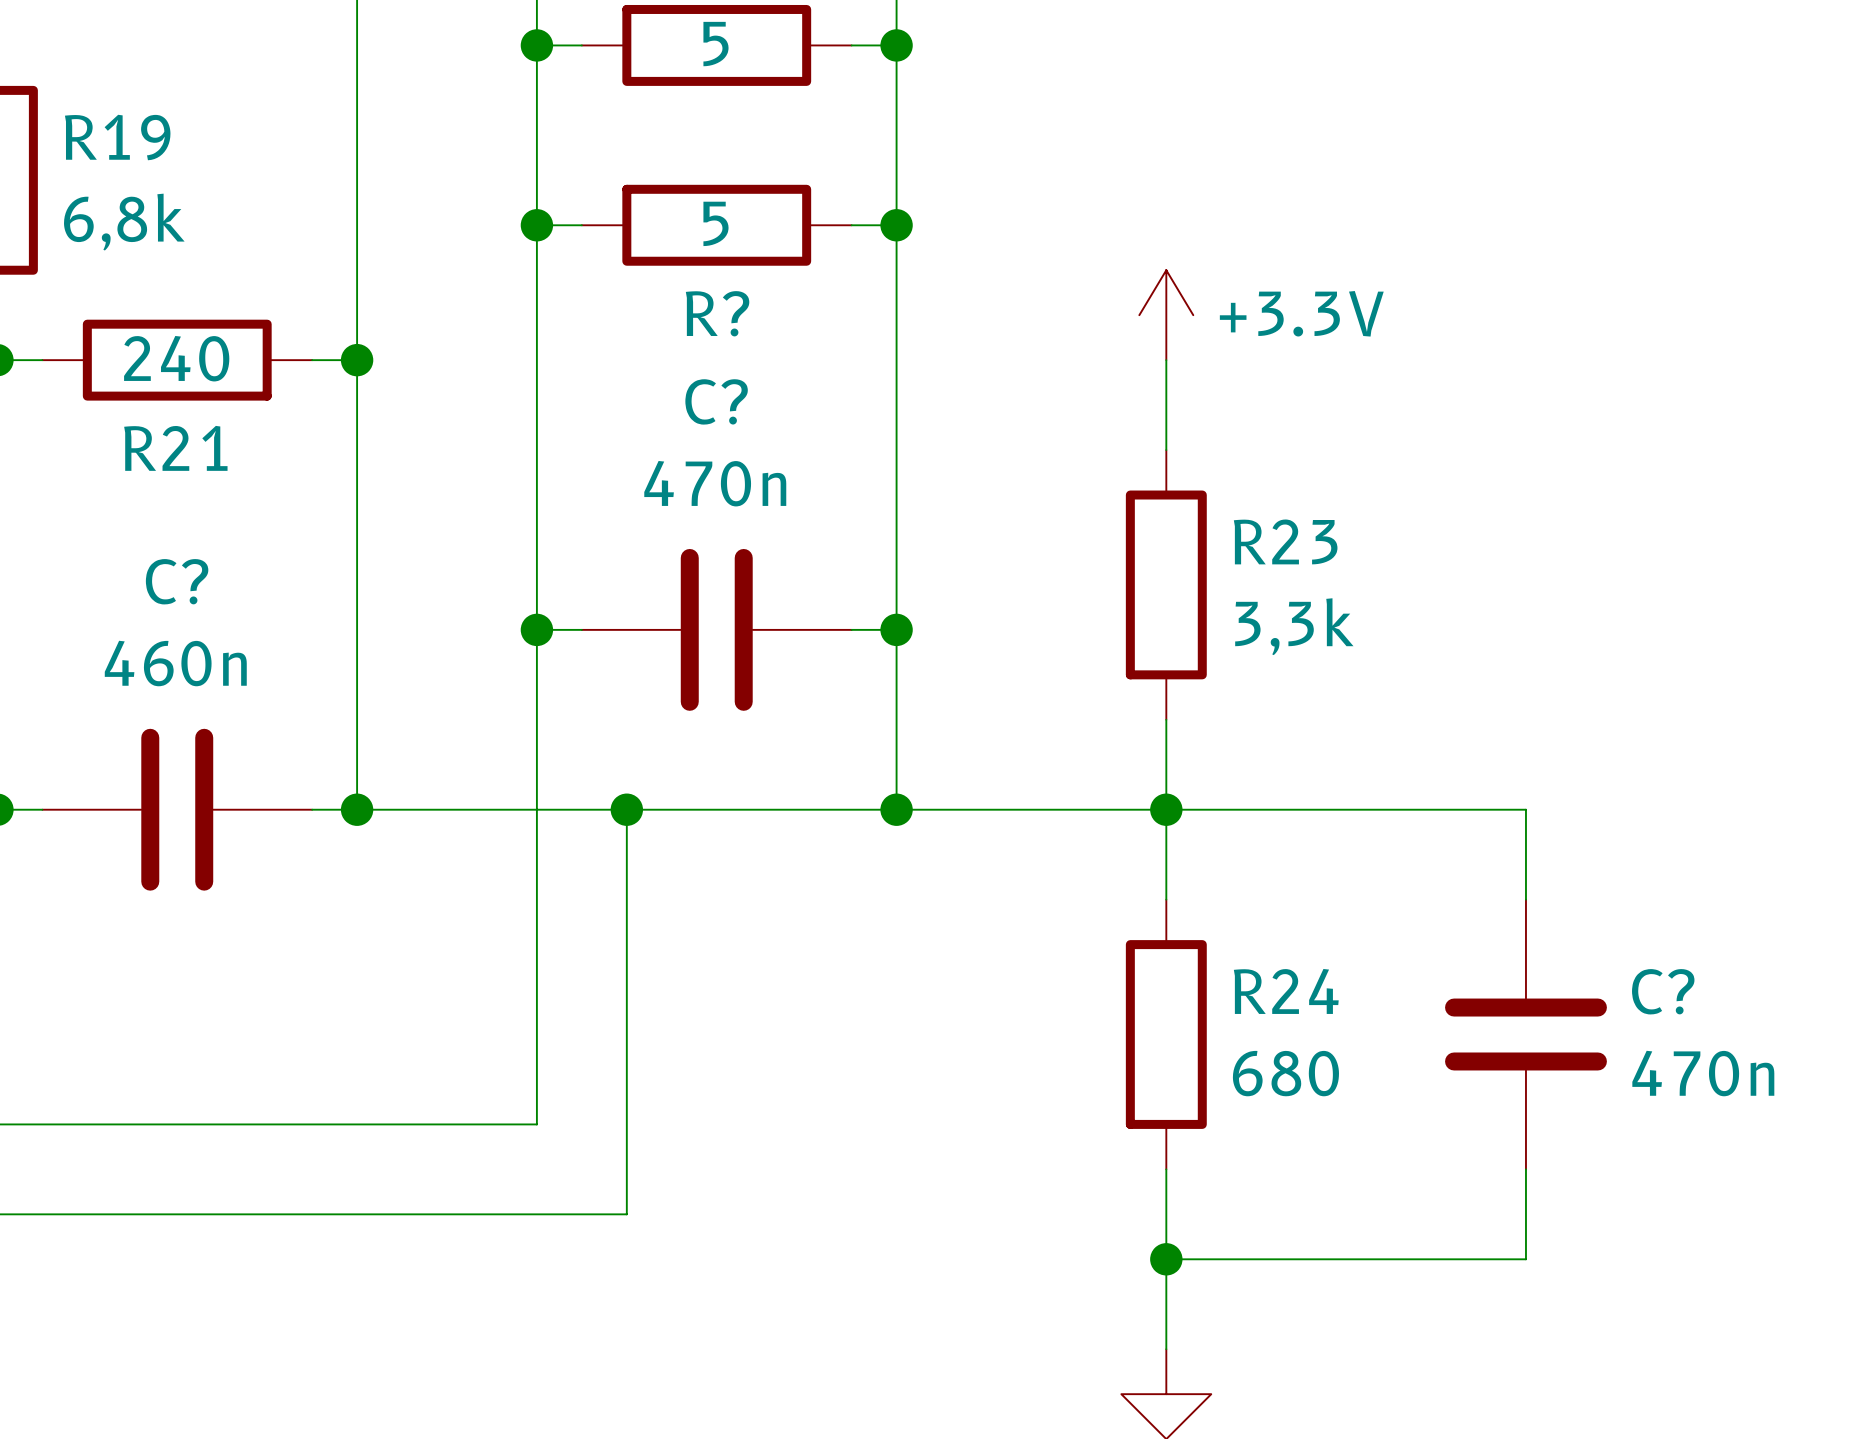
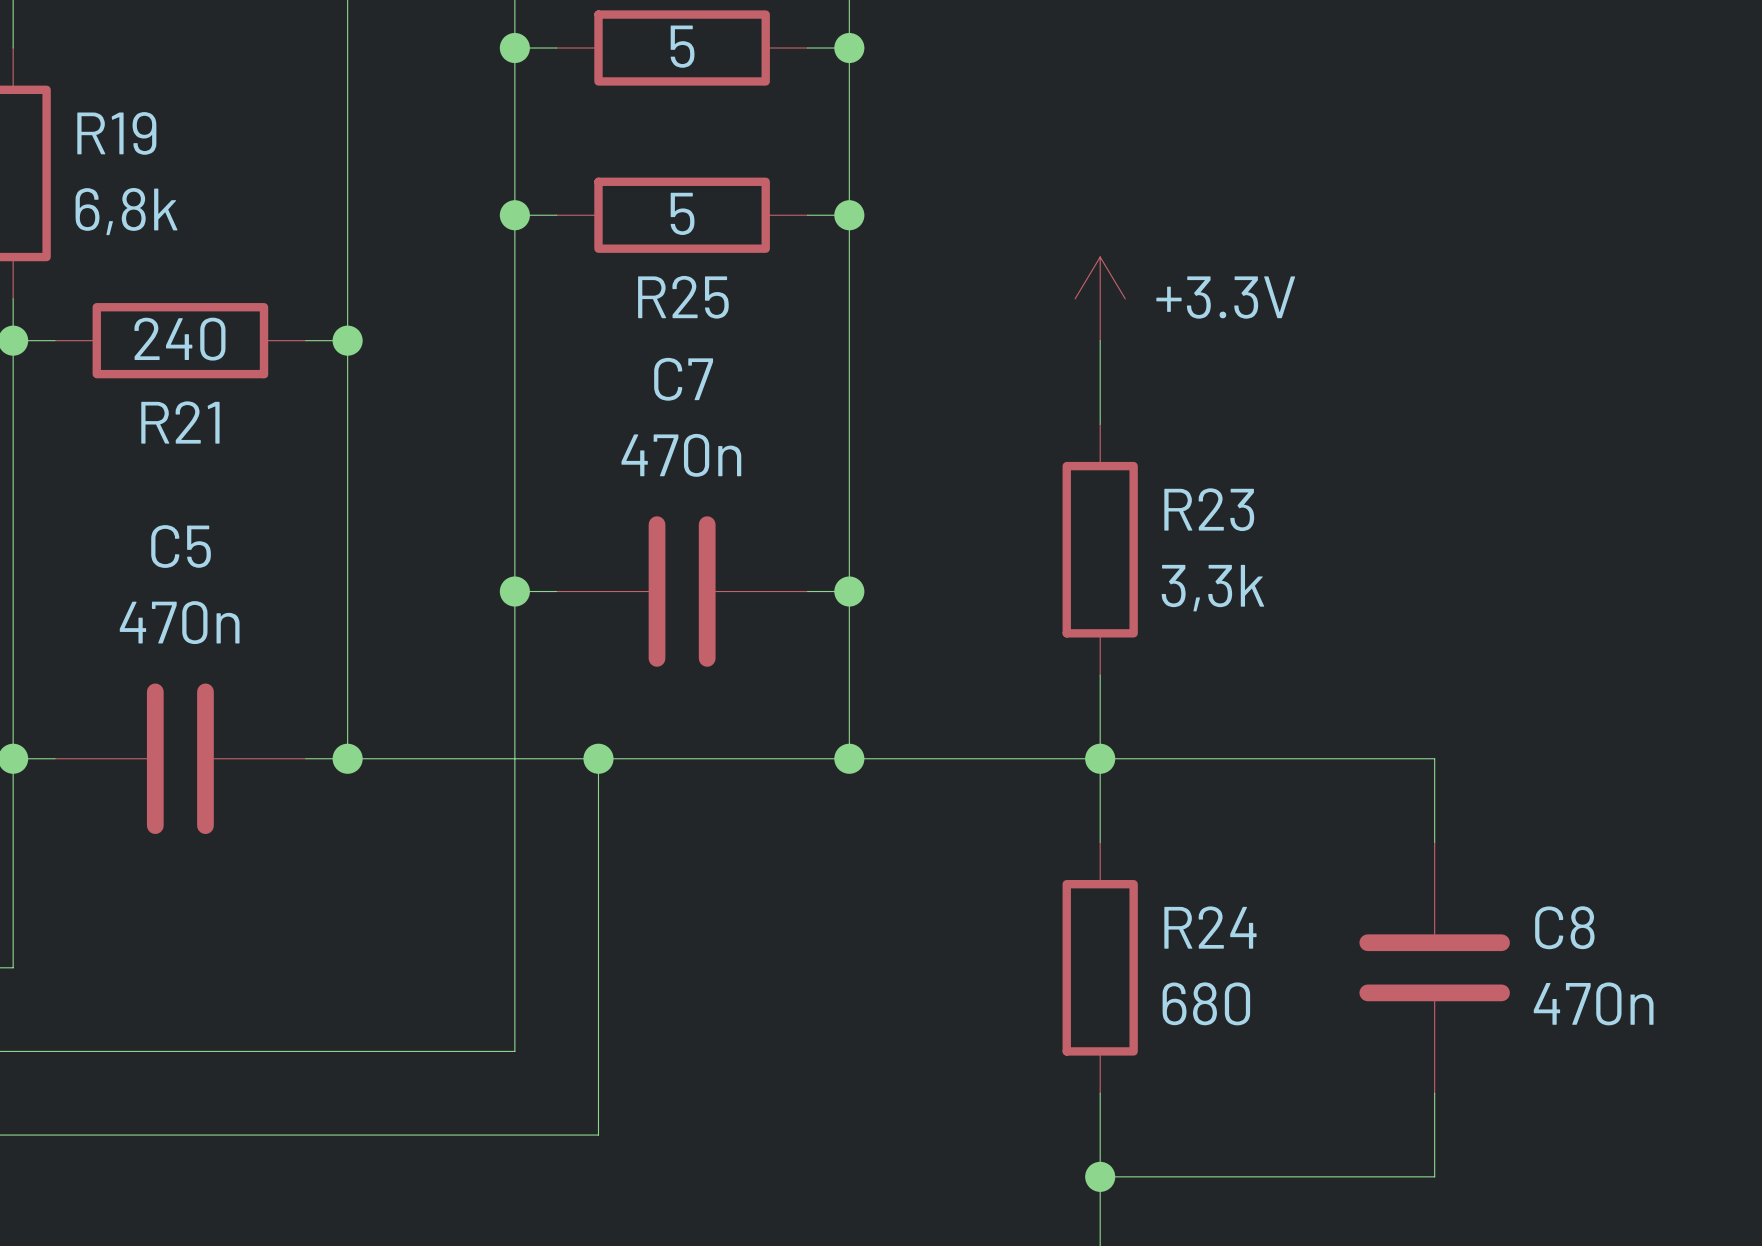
R? name: R? (717, 313) -> R25 (683, 297)
C? name: C? (716, 401) -> C7 (683, 379)
C? name: C? (177, 581) -> C5 (181, 546)
C? value: 460n (175, 663) -> 470n (179, 622)
C? name: C? (1663, 991) -> C8 (1564, 927)

